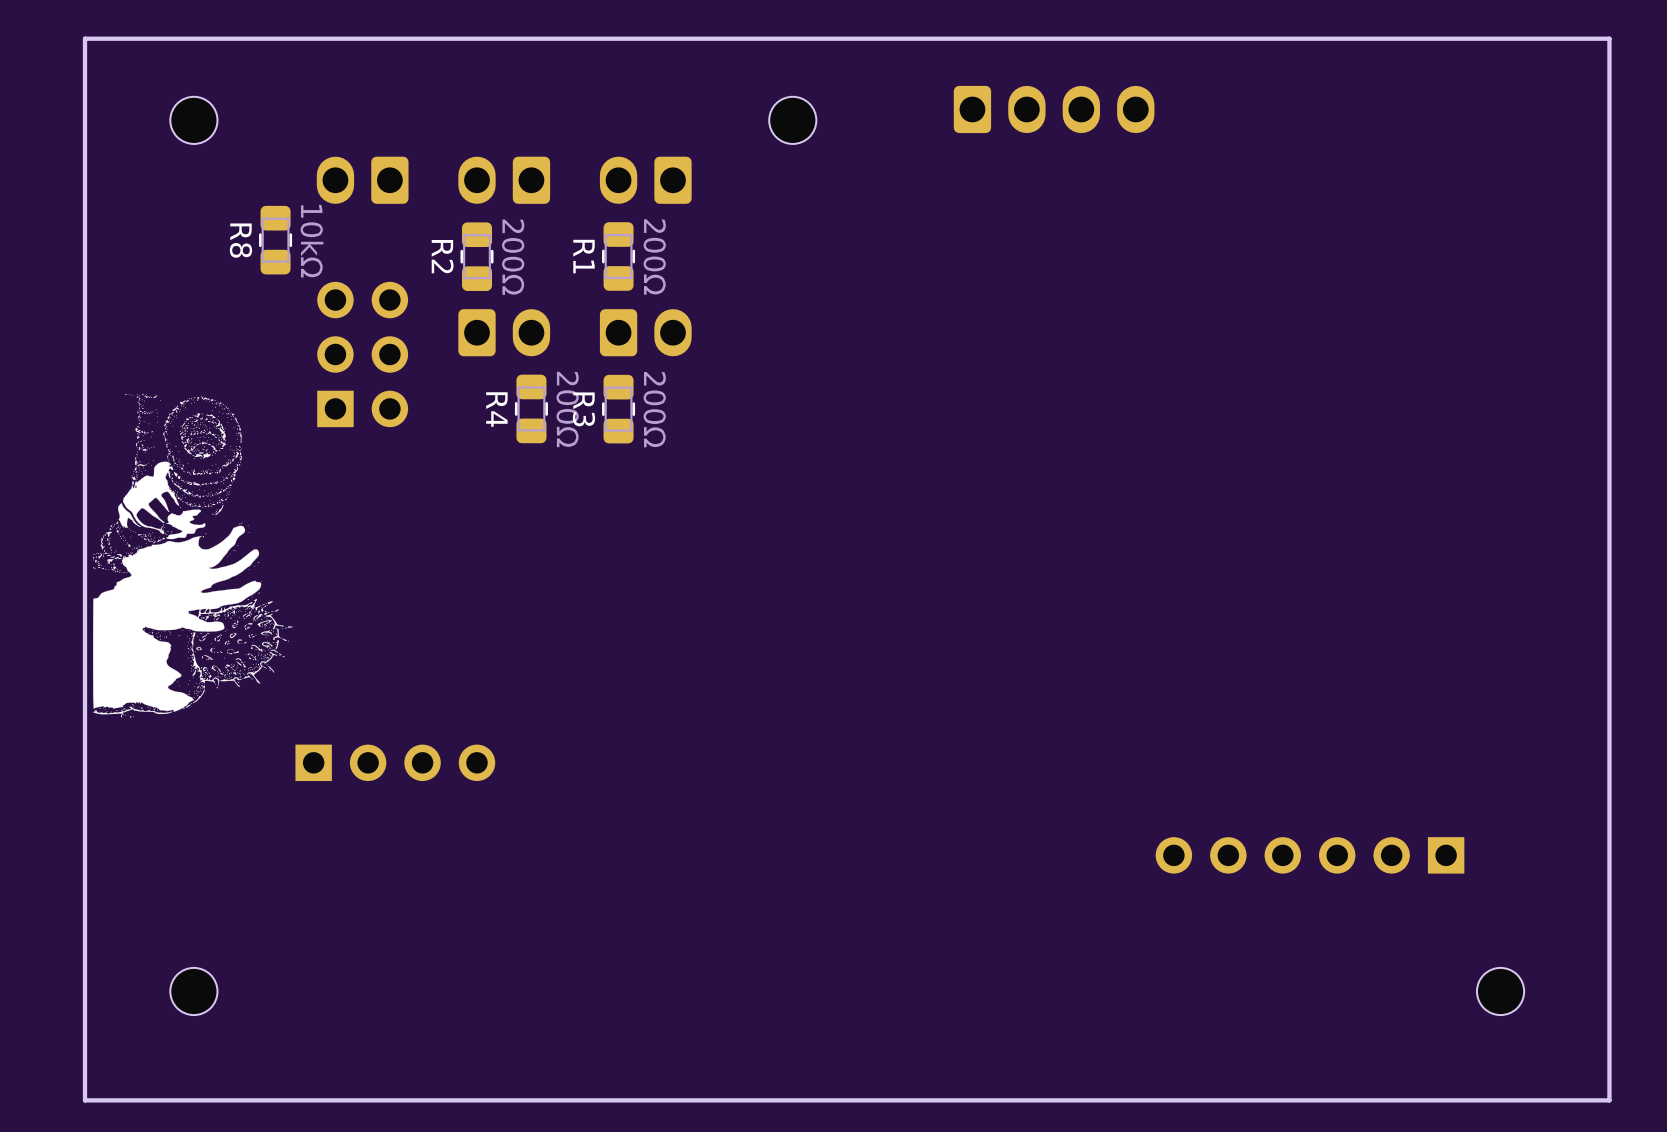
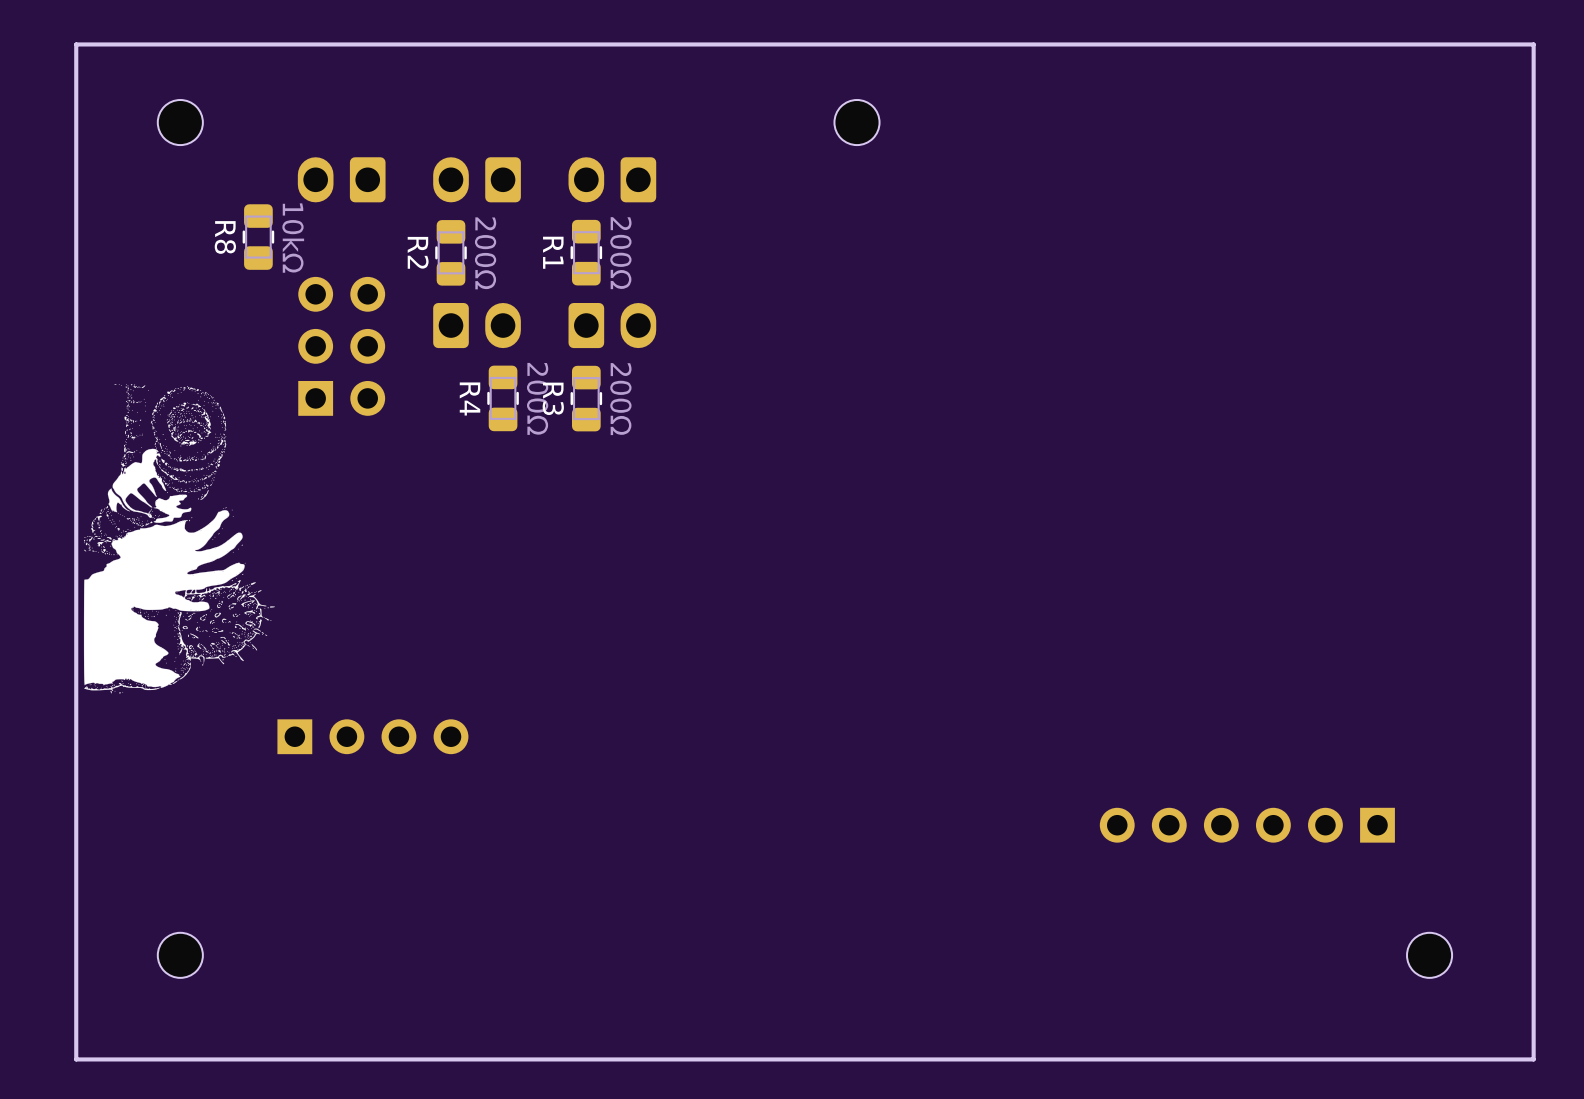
part: (1054, 109) -> none
part position: (792, 120) -> (857, 122)

